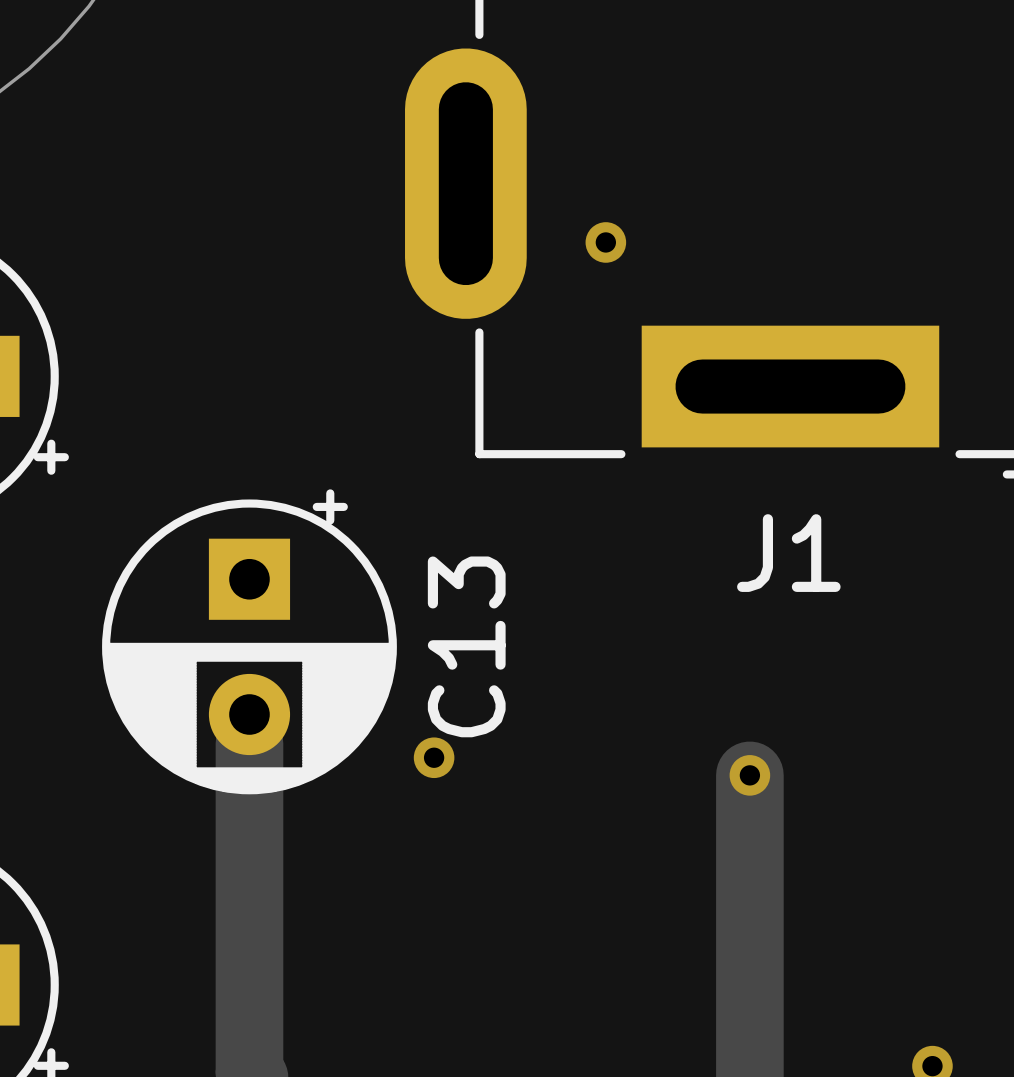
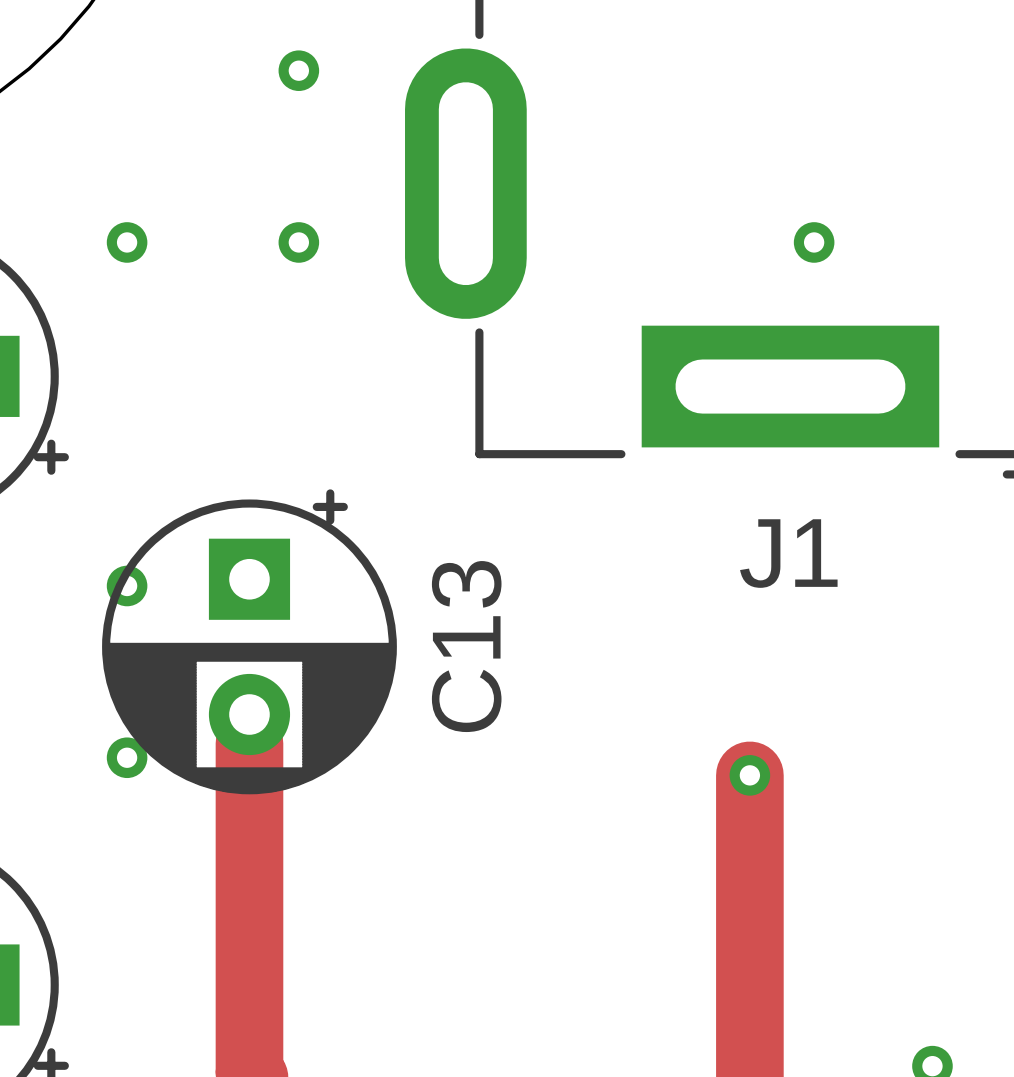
via: none -> (298, 70)
via: none -> (127, 242)
via: none -> (298, 242)
via: (605, 242) -> none
via: none -> (814, 242)
via: none -> (127, 585)
via: none -> (127, 757)
via: (434, 757) -> none

